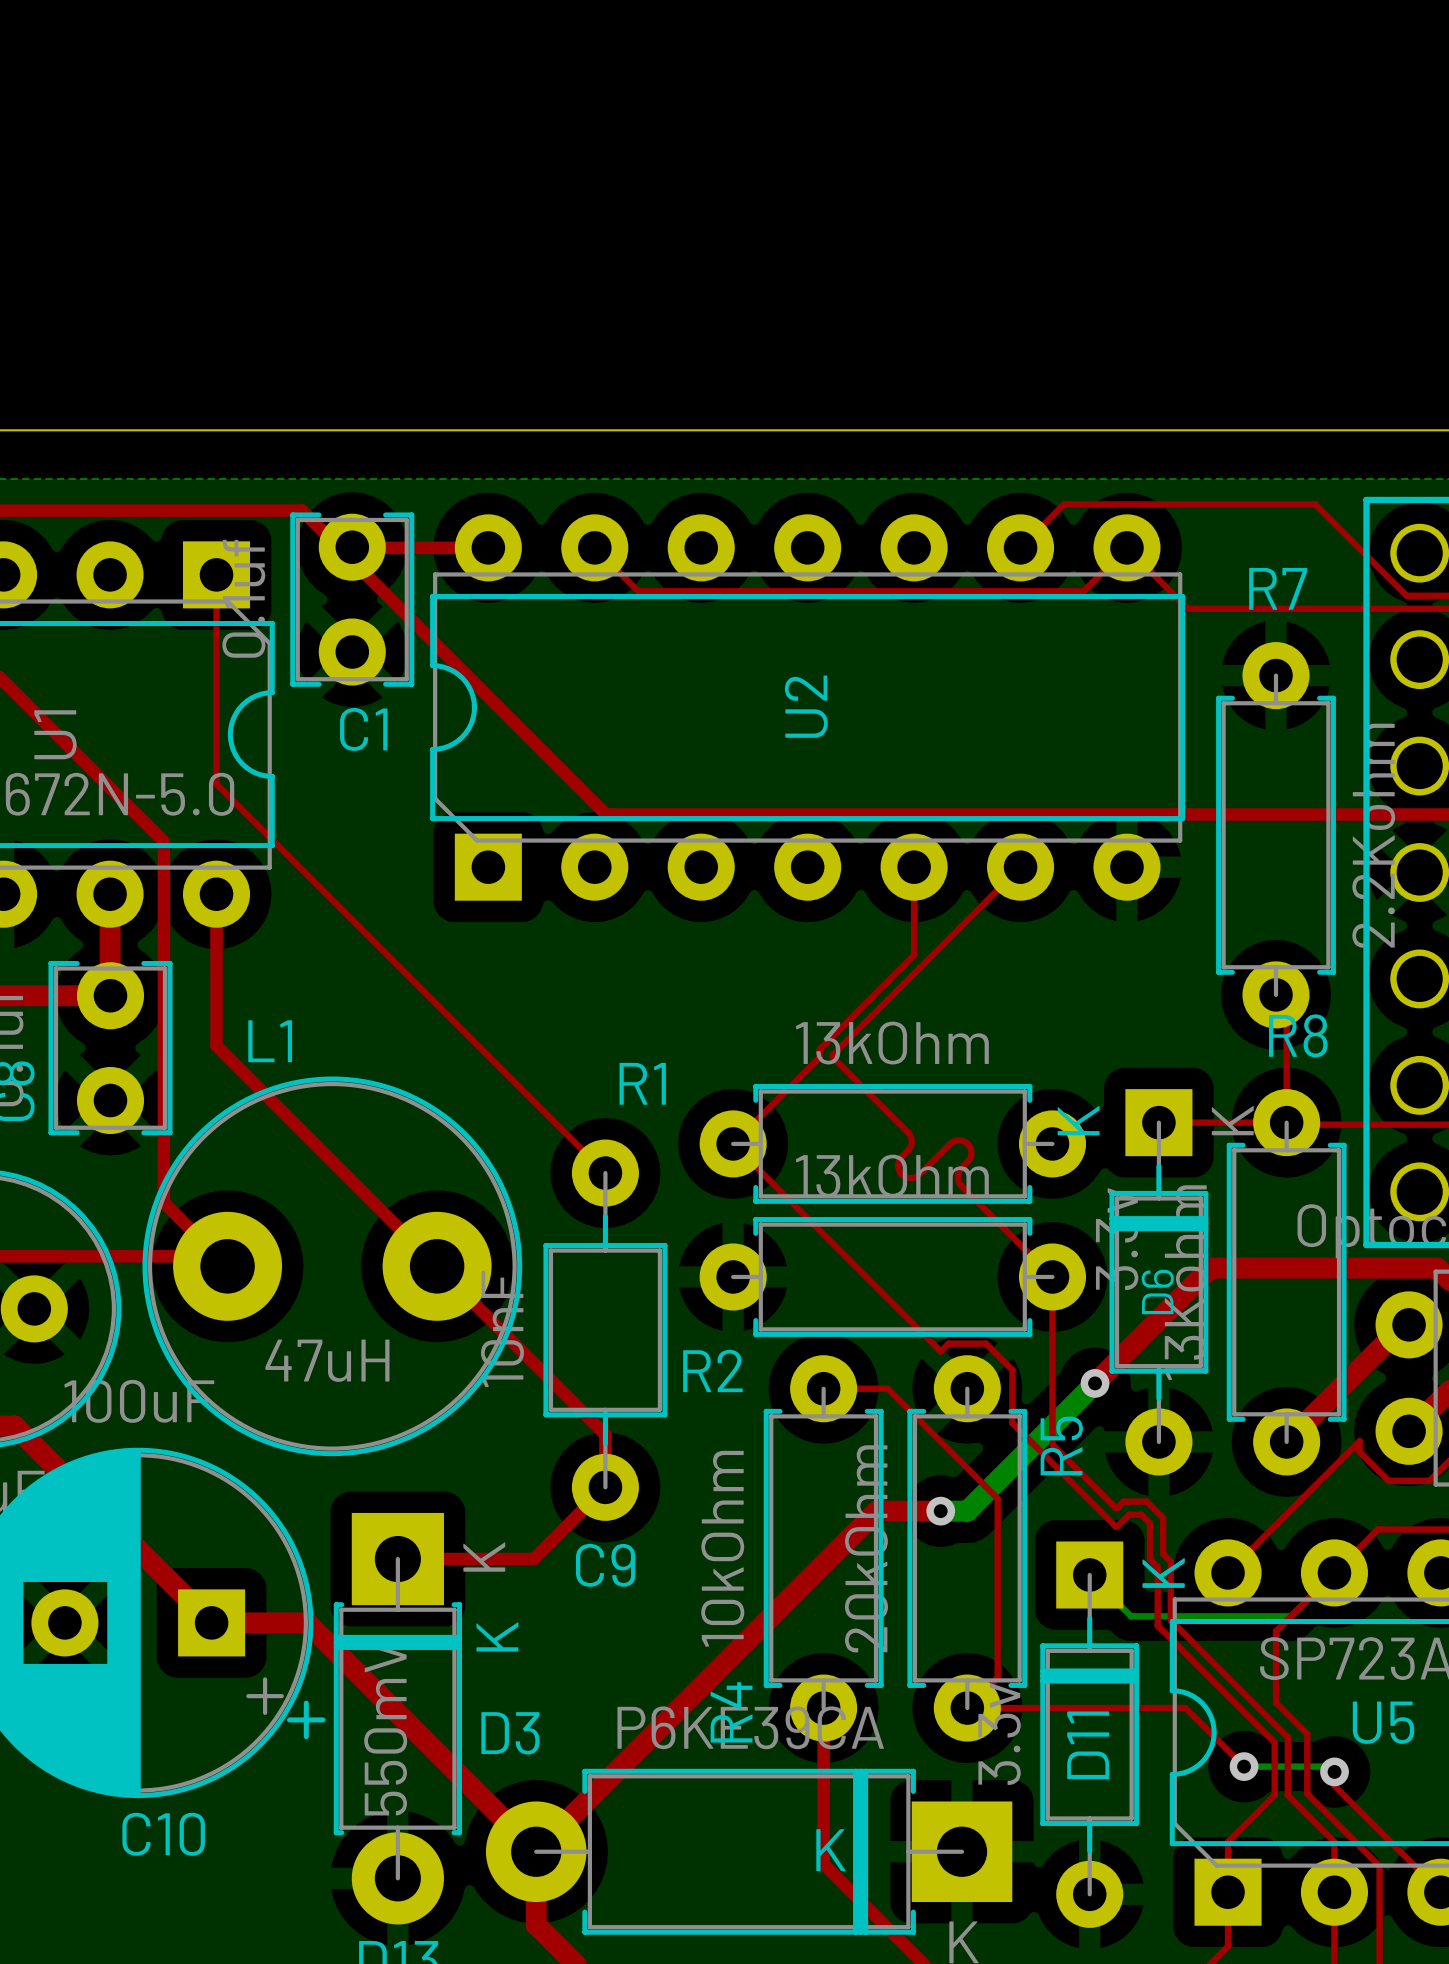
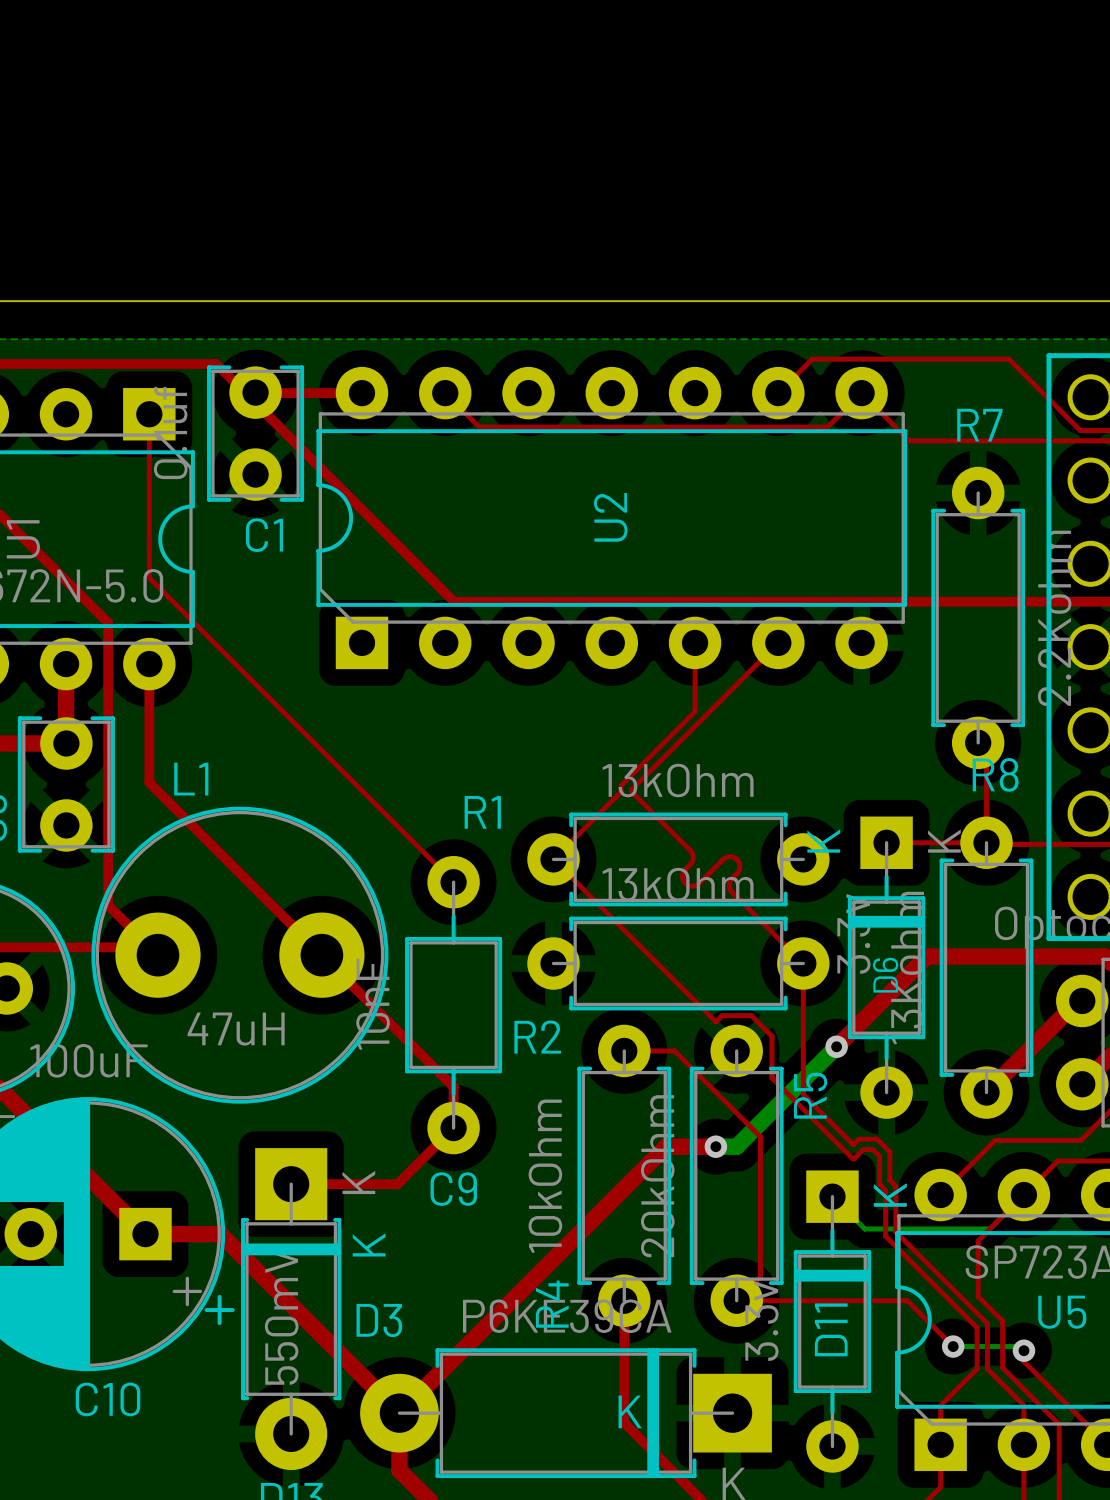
top track: (1429, 1480) (1388, 1480) (1359, 1451) (1359, 1441) (1297, 1503) -> (1098, 1122) (1080, 1140) (995, 1140)

